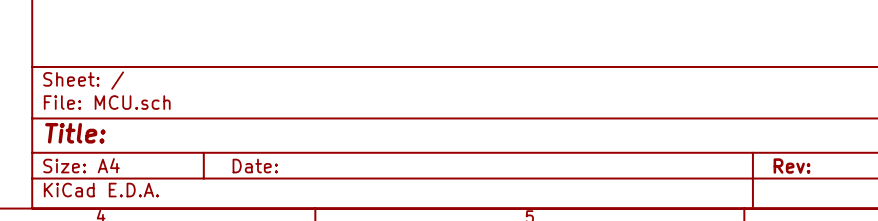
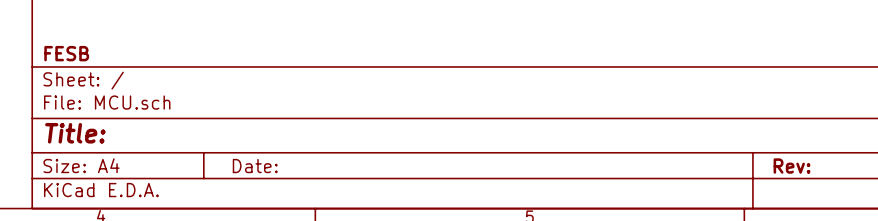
title block: none -> FESB (66, 53)

